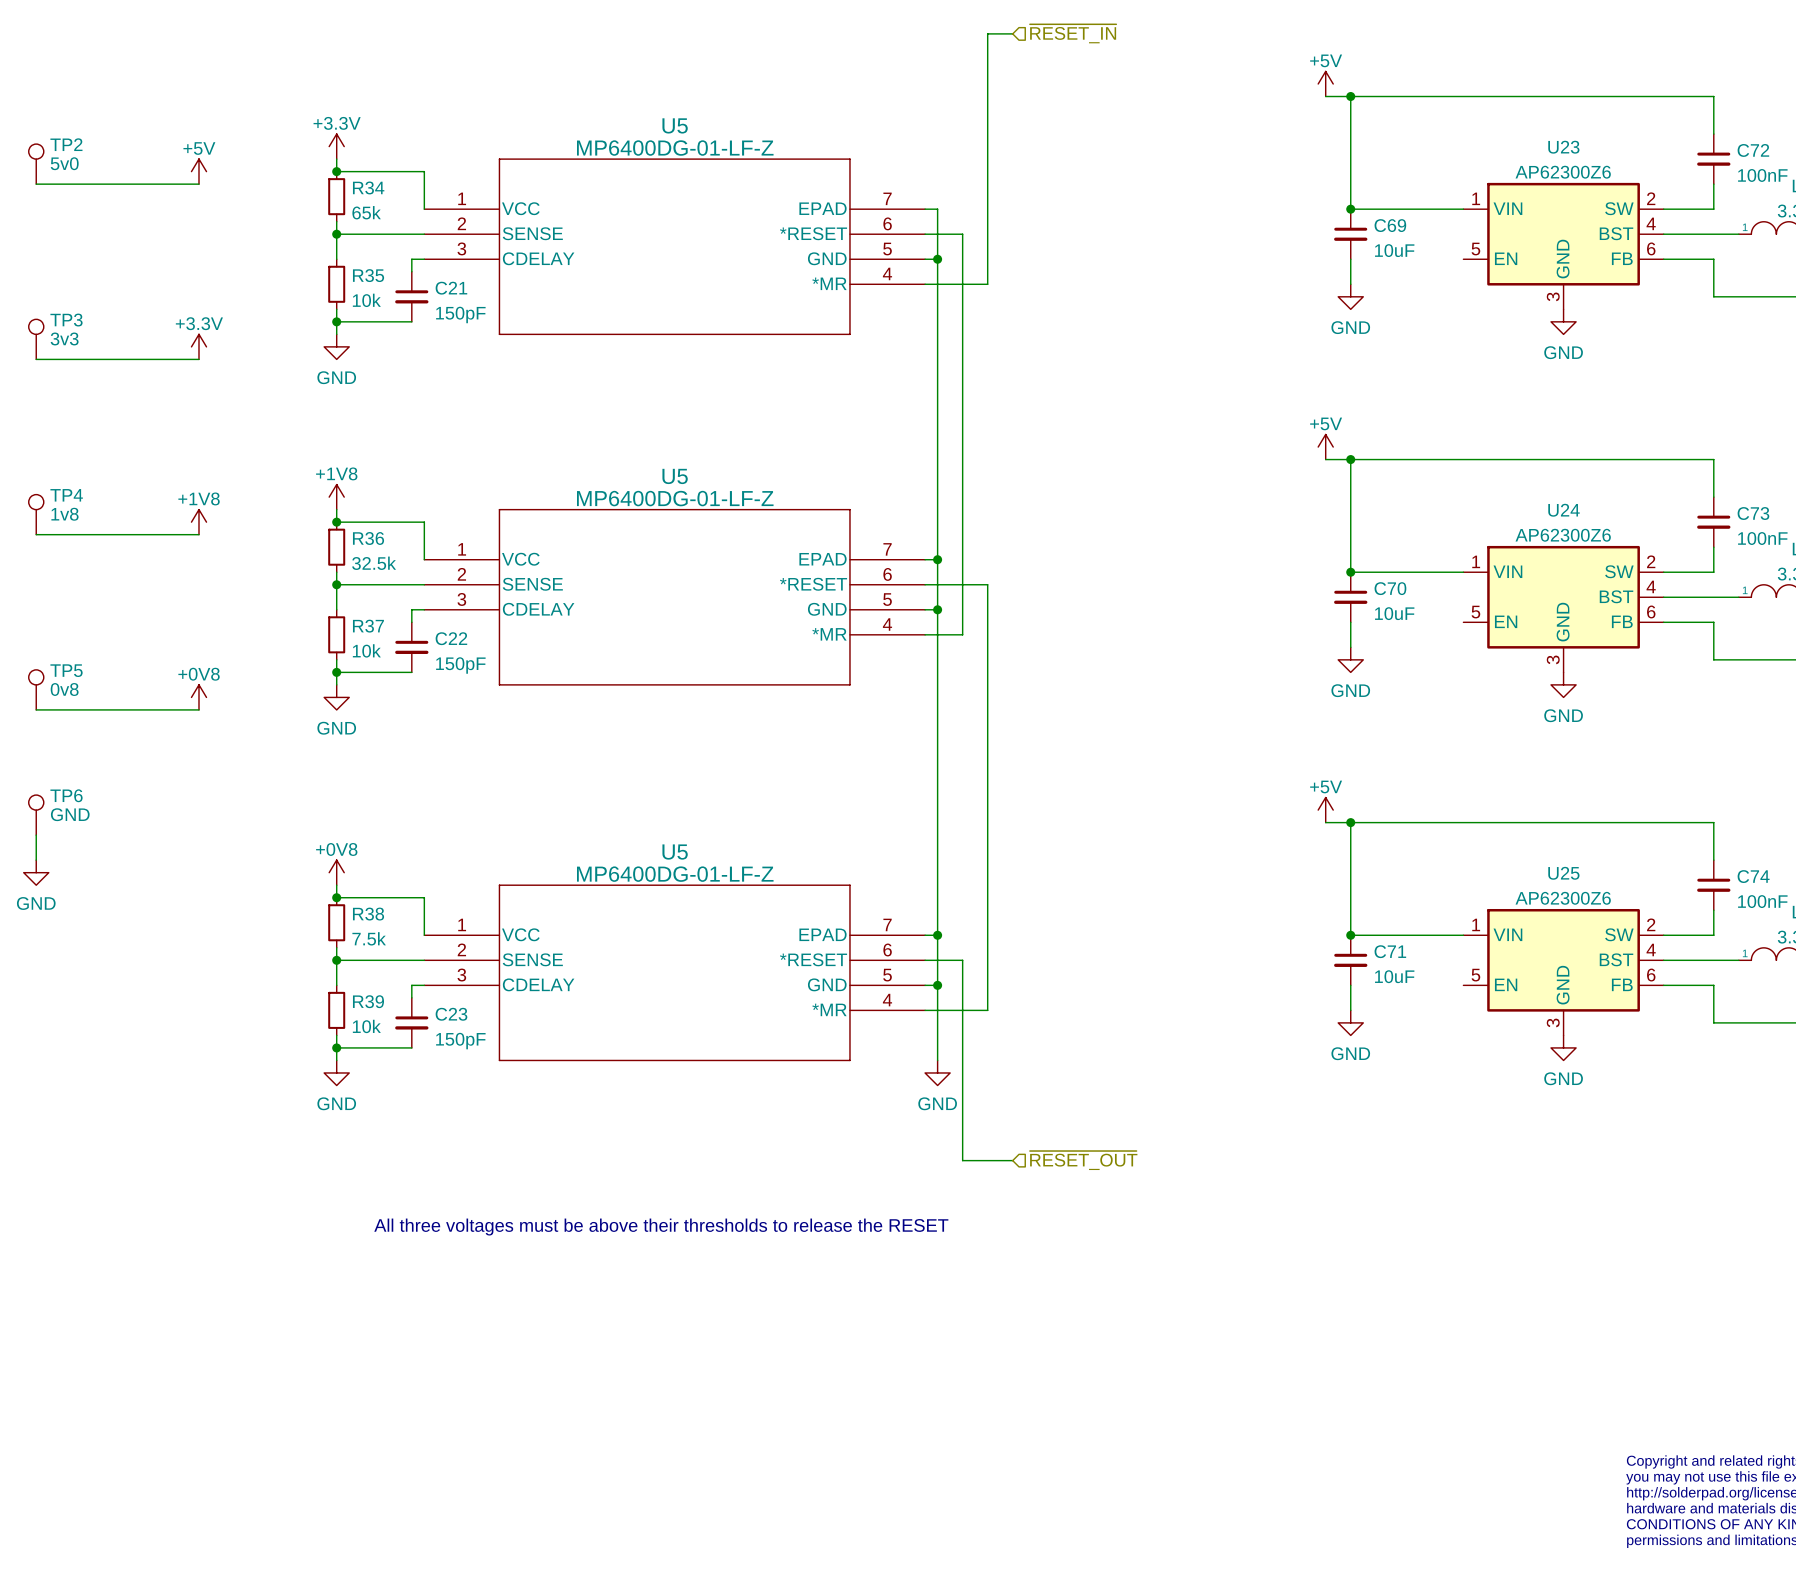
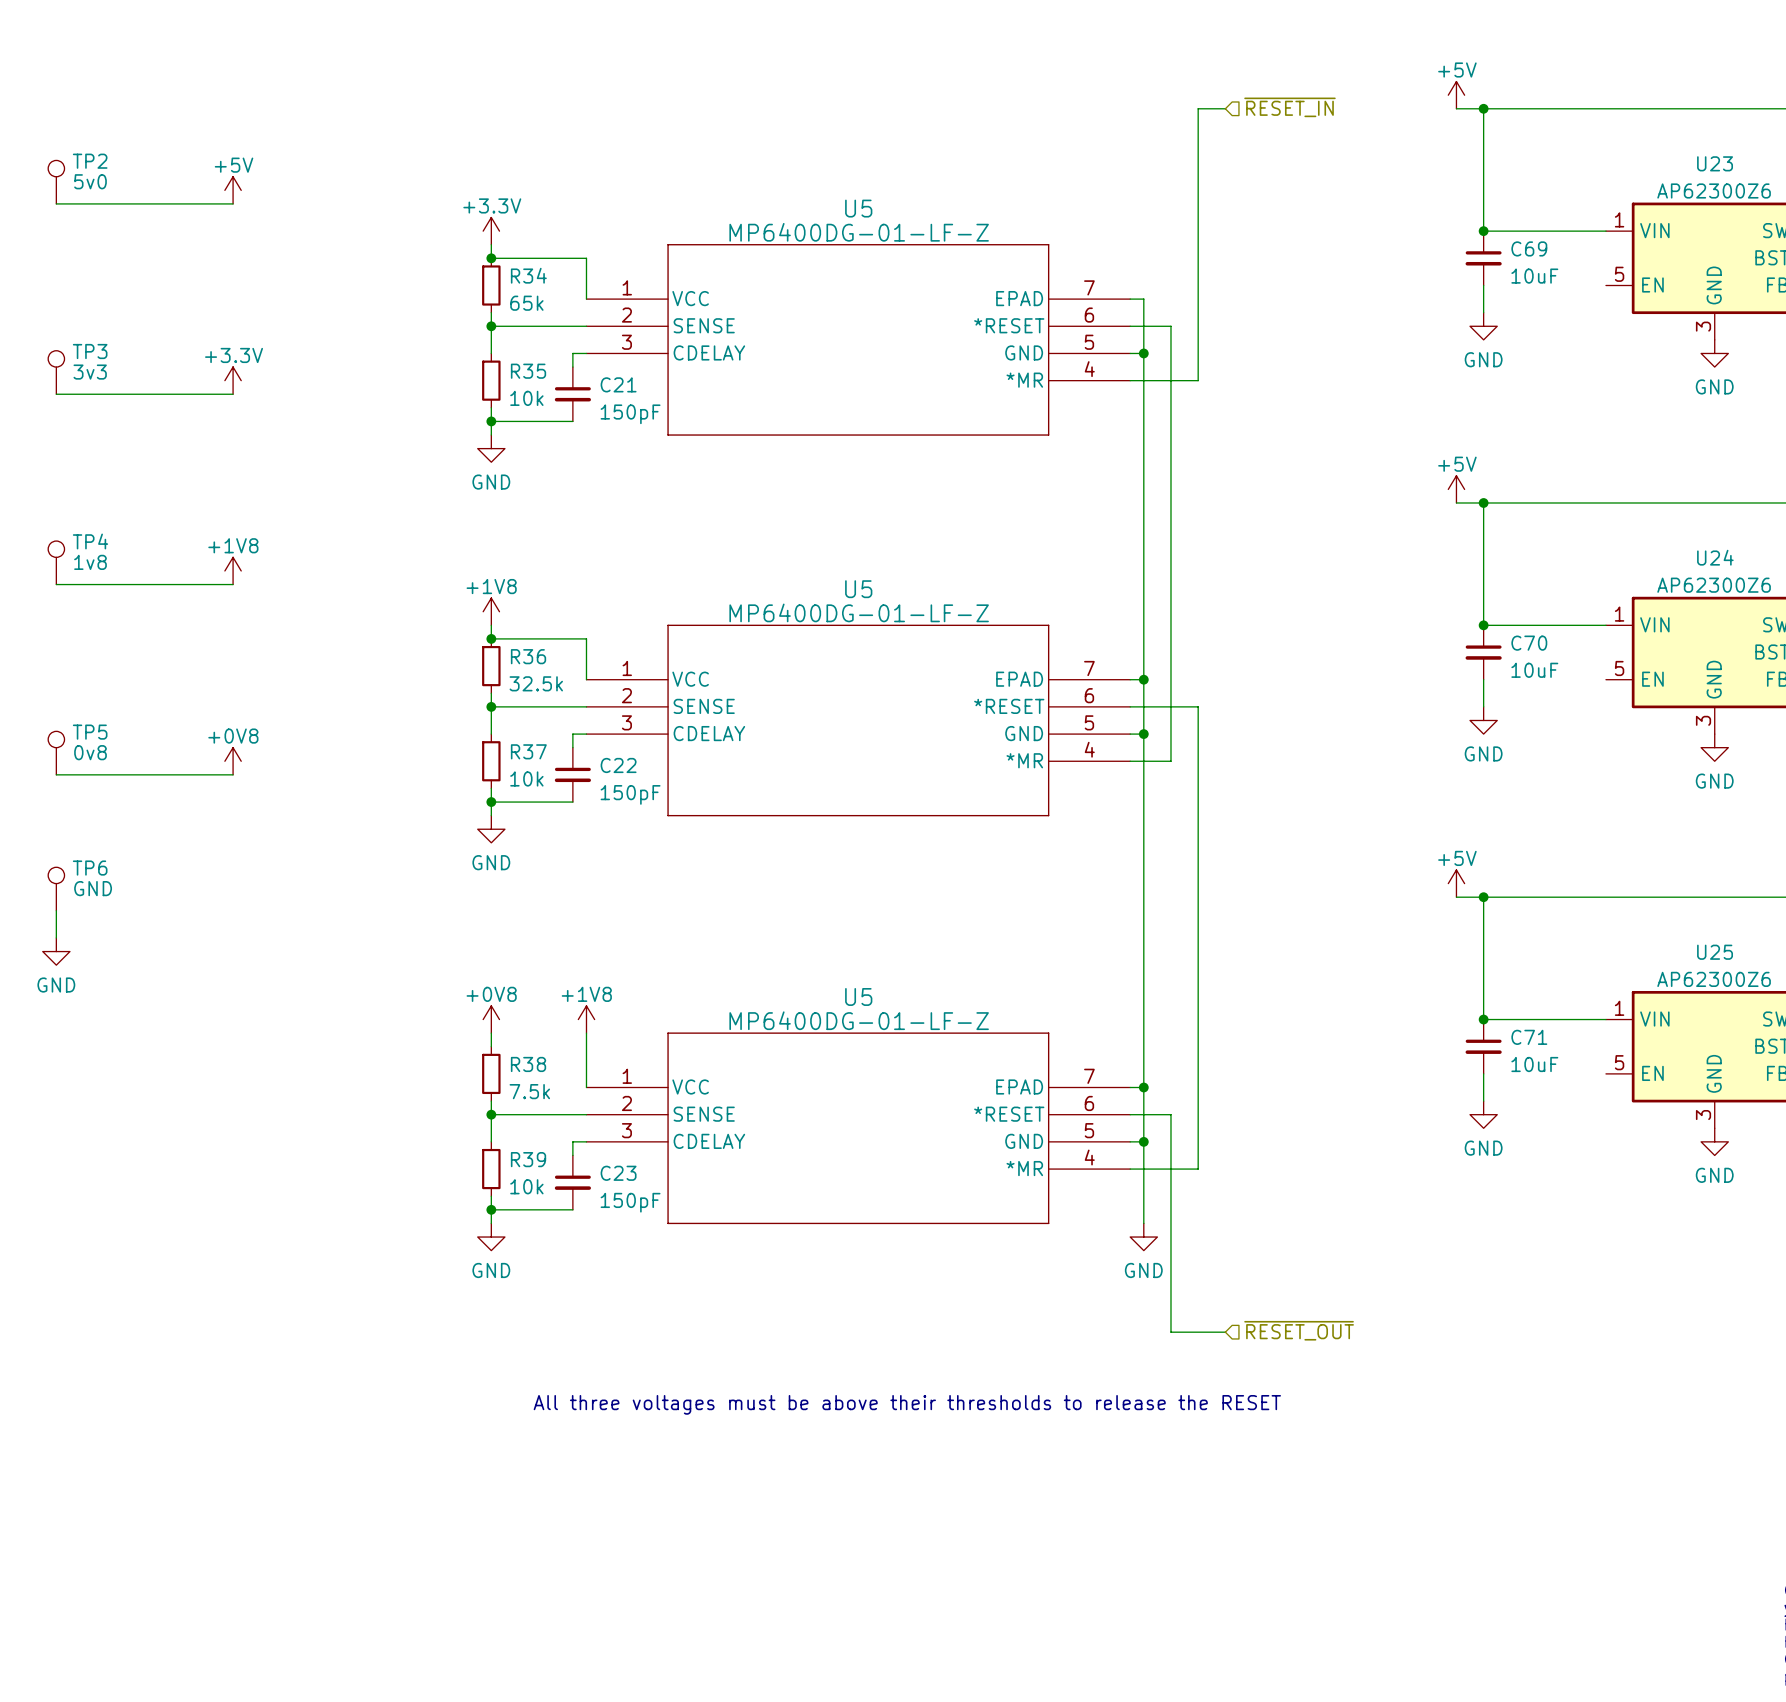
wire: (1012, 33) (987, 33) (987, 284) (925, 284) -> (1225, 108) (1198, 108) (1198, 380) (1130, 380)
hierarchical label position: ~{RESET_IN} (1073, 33) -> ~{RESET_IN} (1289, 107)
power symbol position: +3.3V (336, 146) -> +3.3V (491, 231)
wire: (336, 159) (336, 171) (424, 171) (424, 209) -> (491, 244) (491, 258) (586, 258) (586, 299)
junction: (336, 171) -> none
R34 position: (336, 196) -> (491, 285)
wire: (925, 209) (937, 209) (937, 1060) -> (1130, 299) (1143, 299) (1143, 1223)
wire: (336, 221) (336, 259) -> (491, 312) (491, 353)
wire: (336, 234) (424, 234) -> (491, 326) (586, 326)
junction: (336, 234) -> none
junction: none -> (491, 258)
wire: (925, 234) (962, 234) (962, 634) (925, 634) -> (1130, 326) (1170, 326) (1170, 761) (1130, 761)
U5 position: (674, 246) -> (858, 339)
wire: (424, 259) (411, 259) (411, 271) -> (586, 353) (572, 353) (572, 367)
wire: (925, 259) (937, 259) -> (1130, 353) (1143, 353)
junction: (937, 259) -> none
R35 position: (336, 284) -> (491, 380)
C21 position: (411, 296) -> (572, 394)
junction: none -> (491, 326)
wire: (336, 309) (336, 334) -> (491, 407) (491, 435)
wire: (336, 321) (411, 321) -> (491, 421) (572, 421)
junction: (336, 321) -> none
junction: none -> (1143, 353)
power symbol position: GND (336, 346) -> GND (491, 448)
junction: none -> (491, 421)
power symbol position: +1V8 (336, 497) -> +1V8 (491, 611)
wire: (336, 509) (336, 522) (424, 522) (424, 559) -> (491, 625) (491, 638) (586, 638) (586, 679)
junction: (336, 522) -> none
R36 position: (336, 547) -> (491, 666)
wire: (925, 559) (937, 559) -> (1130, 679) (1143, 679)
junction: (937, 559) -> none
wire: (336, 572) (336, 609) -> (491, 693) (491, 734)
wire: (336, 584) (424, 584) -> (491, 706) (586, 706)
junction: (336, 584) -> none
junction: none -> (491, 638)
wire: (925, 584) (987, 584) (987, 1010) (925, 1010) -> (1130, 706) (1198, 706) (1198, 1169) (1130, 1169)
U5 position: (674, 597) -> (858, 720)
wire: (424, 609) (411, 609) (411, 622) -> (586, 734) (572, 734) (572, 747)
wire: (925, 609) (937, 609) -> (1130, 734) (1143, 734)
junction: (937, 609) -> none
junction: none -> (1143, 679)
R37 position: (336, 634) -> (491, 761)
C22 position: (411, 647) -> (572, 774)
junction: none -> (491, 706)
wire: (336, 659) (336, 684) -> (491, 788) (491, 815)
wire: (336, 672) (411, 672) -> (491, 802) (572, 802)
junction: (336, 672) -> none
junction: none -> (1143, 734)
power symbol position: GND (336, 697) -> GND (491, 829)
junction: none -> (491, 802)
power symbol position: +0V8 (336, 872) -> +0V8 (491, 1019)
wire: (336, 885) (336, 897) (424, 897) (424, 935) -> none
junction: (336, 897) -> none
R38 position: (336, 922) -> (491, 1073)
power symbol: none -> +1V8 (586, 1019)
wire: (925, 935) (937, 935) -> (1130, 1087) (1143, 1087)
junction: (937, 935) -> none
wire: (336, 947) (336, 985) -> (491, 1101) (491, 1141)
wire: none -> (491, 1033) (491, 1046)
wire: none -> (586, 1033) (586, 1087)
wire: (336, 960) (424, 960) -> (491, 1114) (586, 1114)
junction: (336, 960) -> none
wire: (925, 960) (962, 960) (962, 1160) (1012, 1160) -> (1130, 1114) (1170, 1114) (1170, 1332) (1225, 1332)
U5 position: (674, 972) -> (858, 1128)
wire: (424, 985) (411, 985) (411, 997) -> (586, 1141) (572, 1141) (572, 1155)
wire: (925, 985) (937, 985) -> (1130, 1141) (1143, 1141)
junction: (937, 985) -> none
junction: none -> (1143, 1087)
R39 position: (336, 1010) -> (491, 1169)
C23 position: (411, 1022) -> (572, 1182)
junction: none -> (491, 1114)
wire: (336, 1035) (336, 1060) -> (491, 1196) (491, 1223)
wire: (336, 1047) (411, 1047) -> (491, 1209) (572, 1209)
junction: (336, 1047) -> none
junction: none -> (1143, 1141)
power symbol position: GND (336, 1072) -> GND (491, 1237)
power symbol position: GND (937, 1072) -> GND (1143, 1237)
junction: none -> (491, 1209)
hierarchical label position: ~{RESET_OUT} (1083, 1160) -> ~{RESET_OUT} (1299, 1330)
text position: All three voltages must be above their thresholds to release the RESET (661, 1227) -> All three voltages must be above their thresholds to release the RESET (907, 1404)

